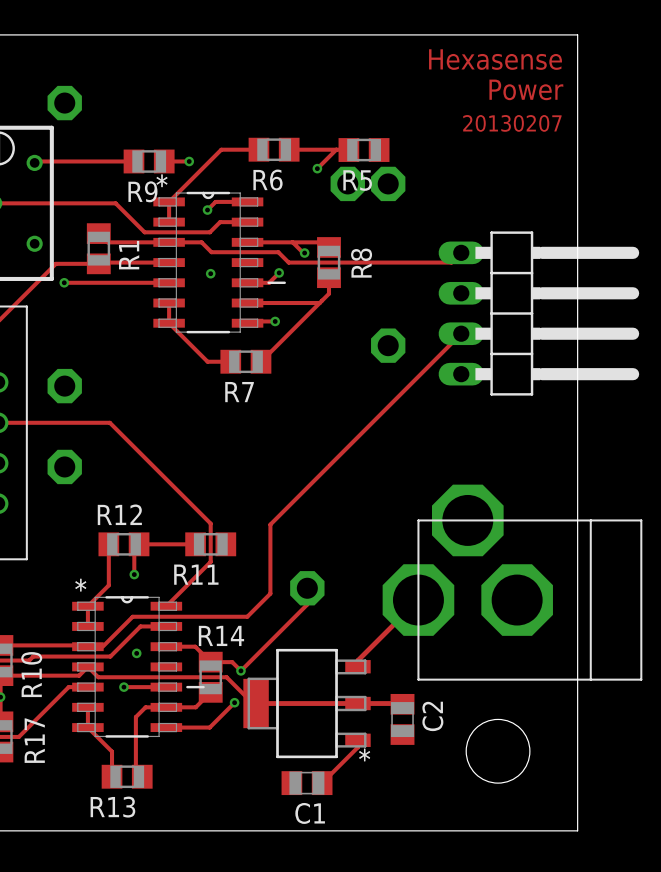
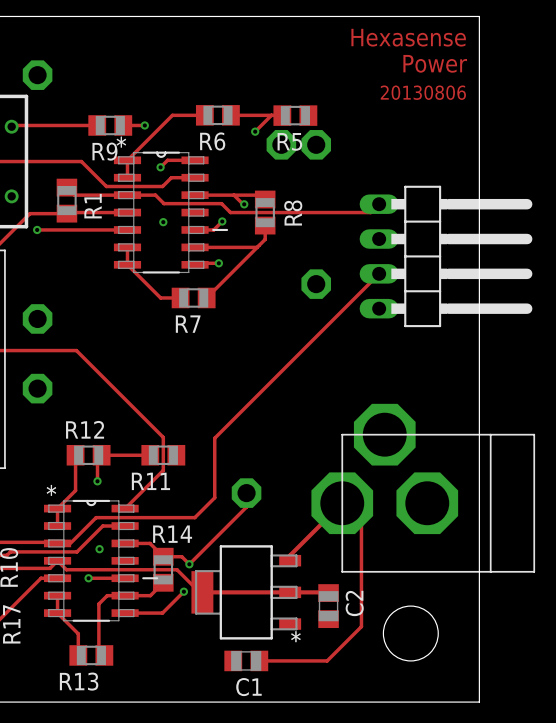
text: 20130207 (512, 123) -> 20130806 (423, 92)
track: (357, 740) (357, 747) (322, 783) -> (342, 503) (361, 522) (361, 626) (327, 660) (259, 660)

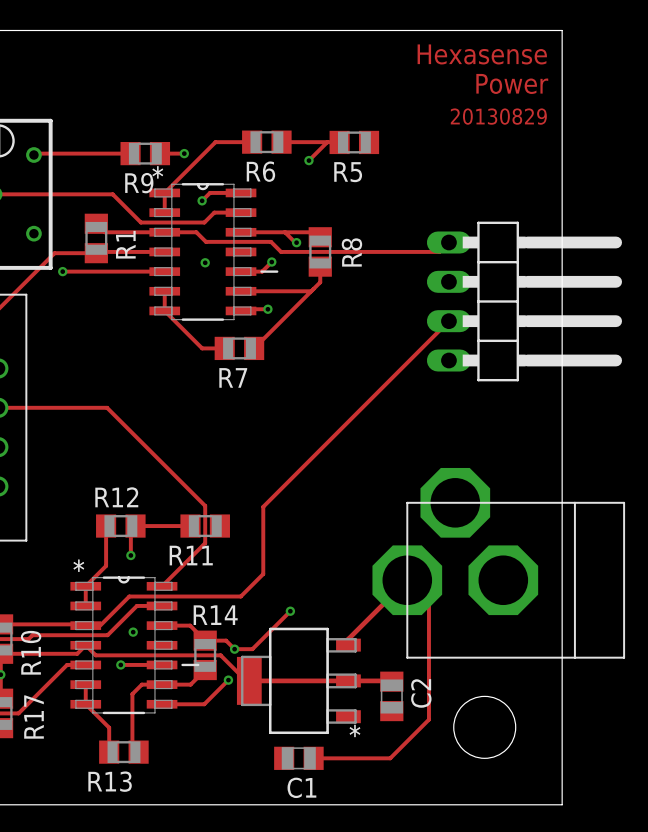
part: (37, 75) -> none
text: 20130806 (423, 92) -> 20130829 (498, 116)
part: (281, 144) -> none
part: (316, 144) -> none
part: (316, 284) -> none
part: (37, 318) -> none
part: (37, 388) -> none
track: (246, 493) (246, 507) (189, 564) -> (290, 611) (252, 649) (234, 649)
part: (246, 493) -> none
via: none -> (290, 611)

